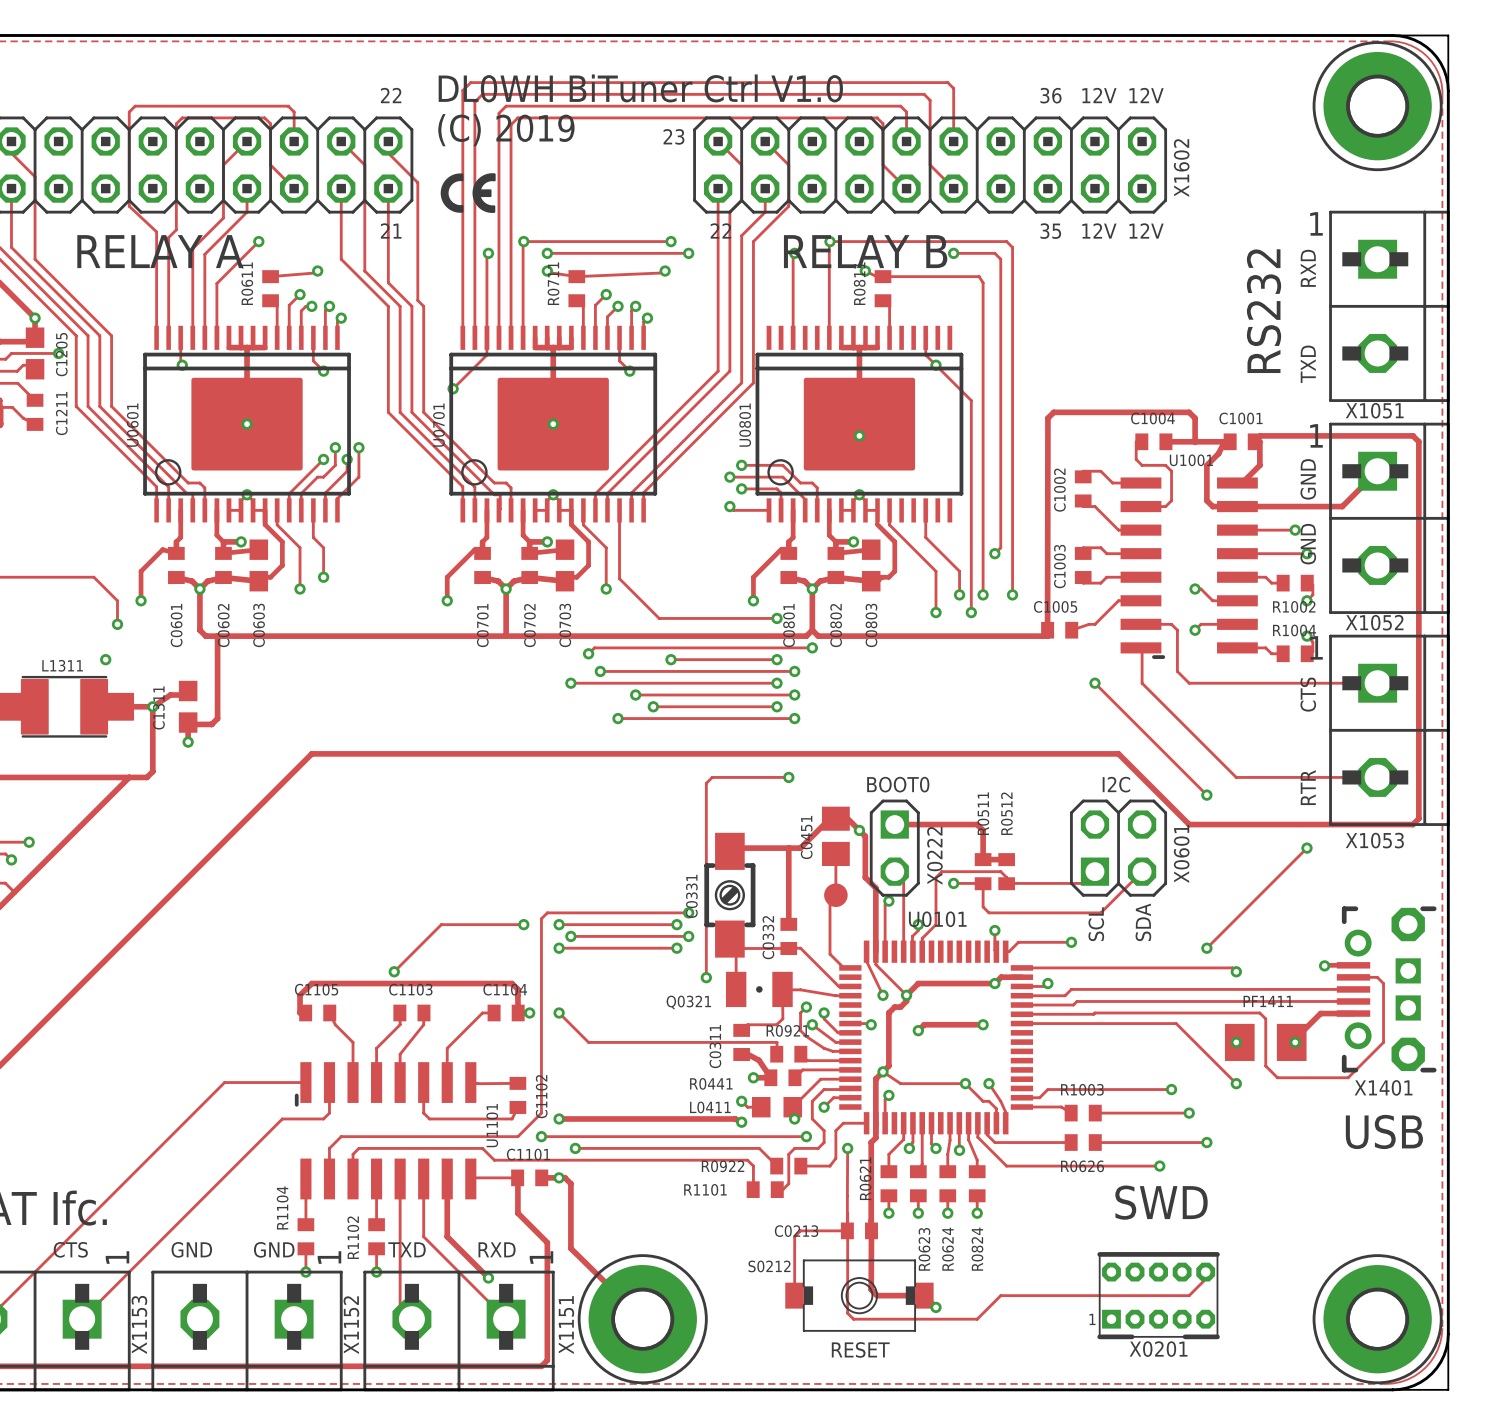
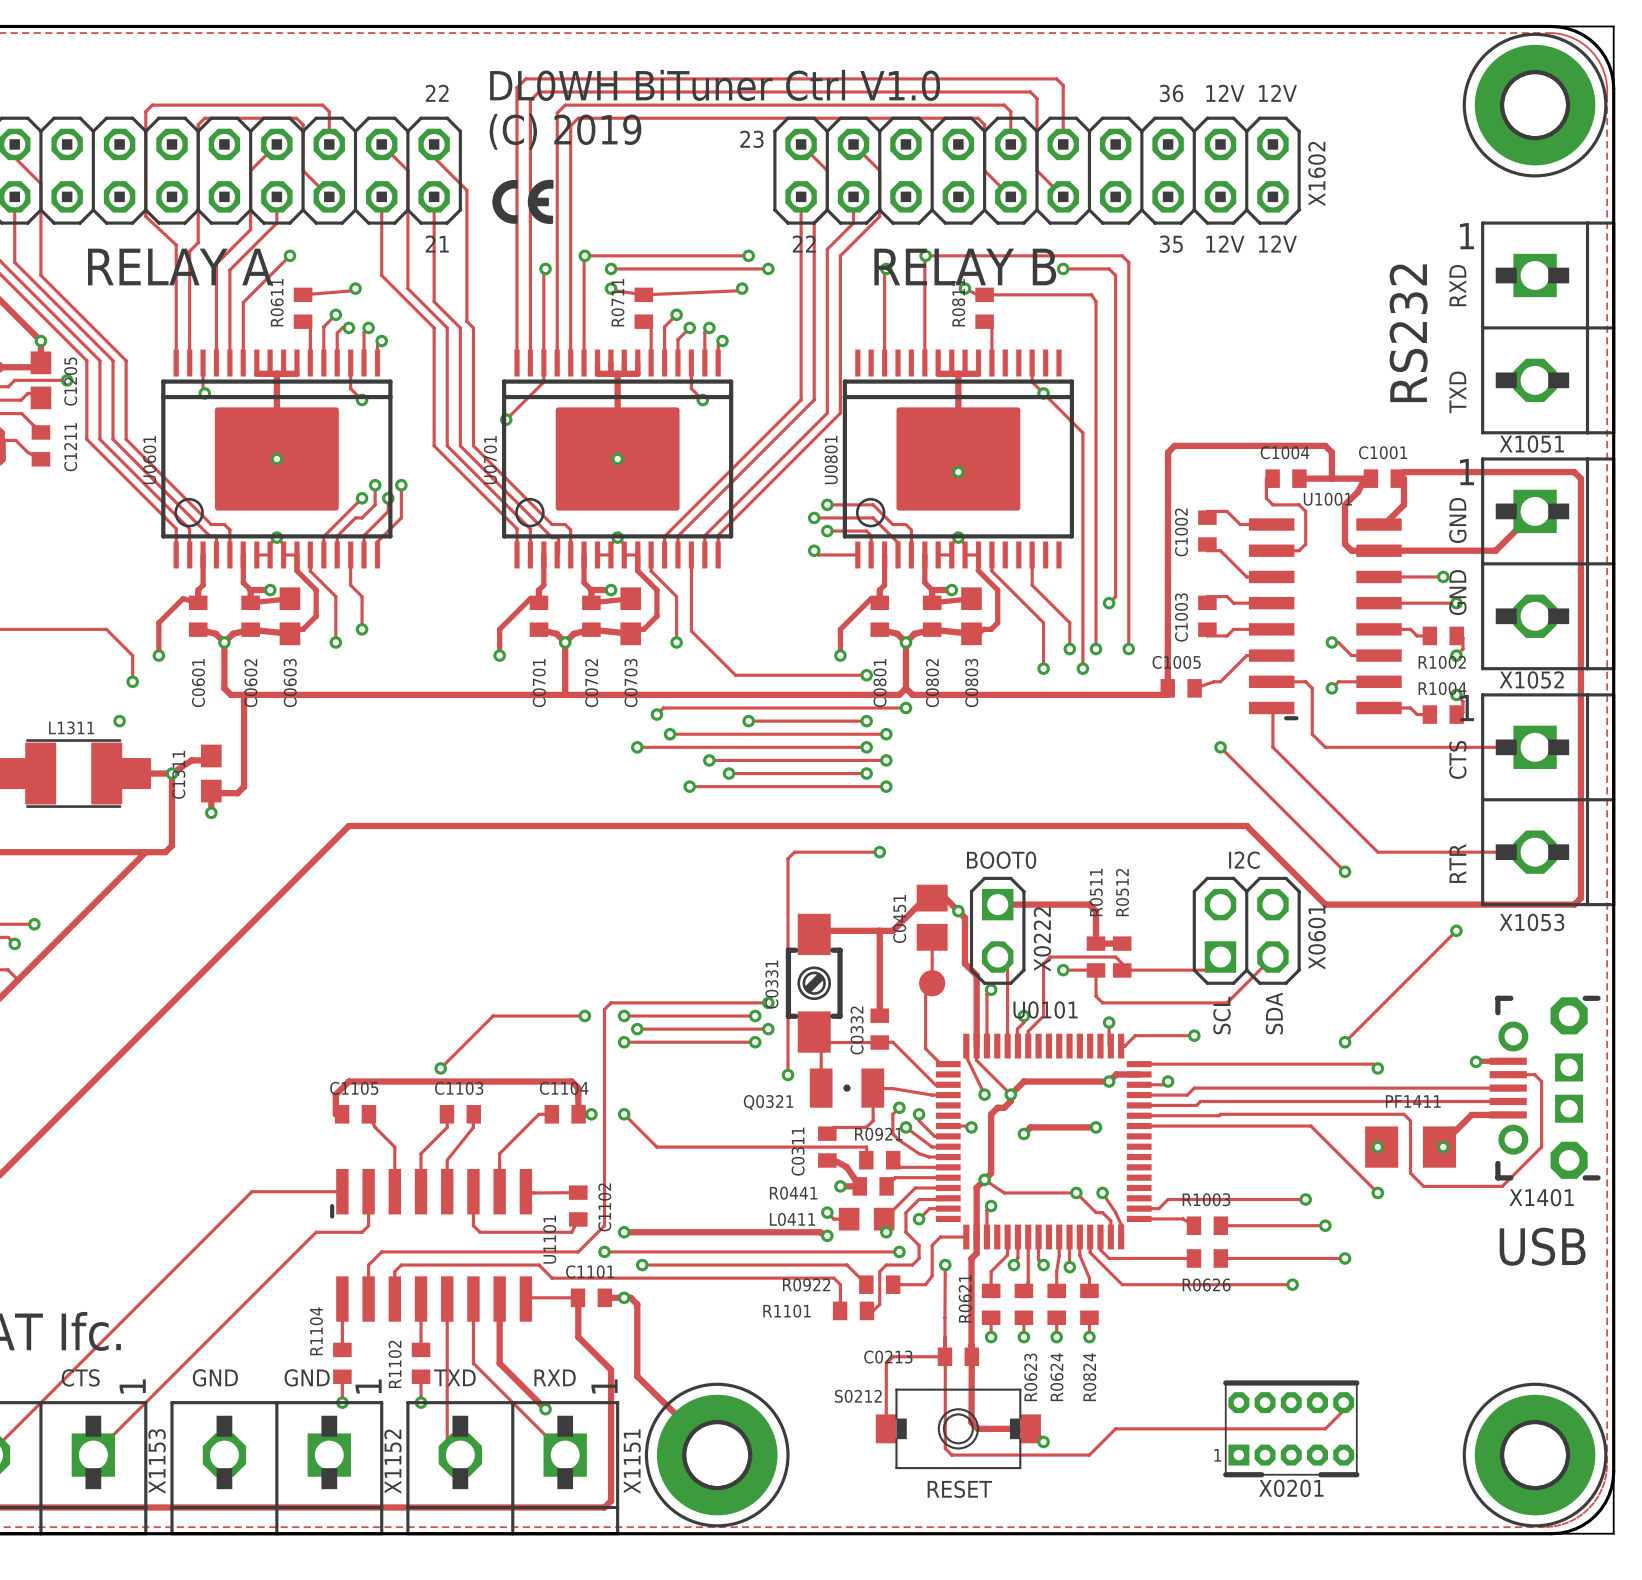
text: SWD (1161, 1202) -> none

